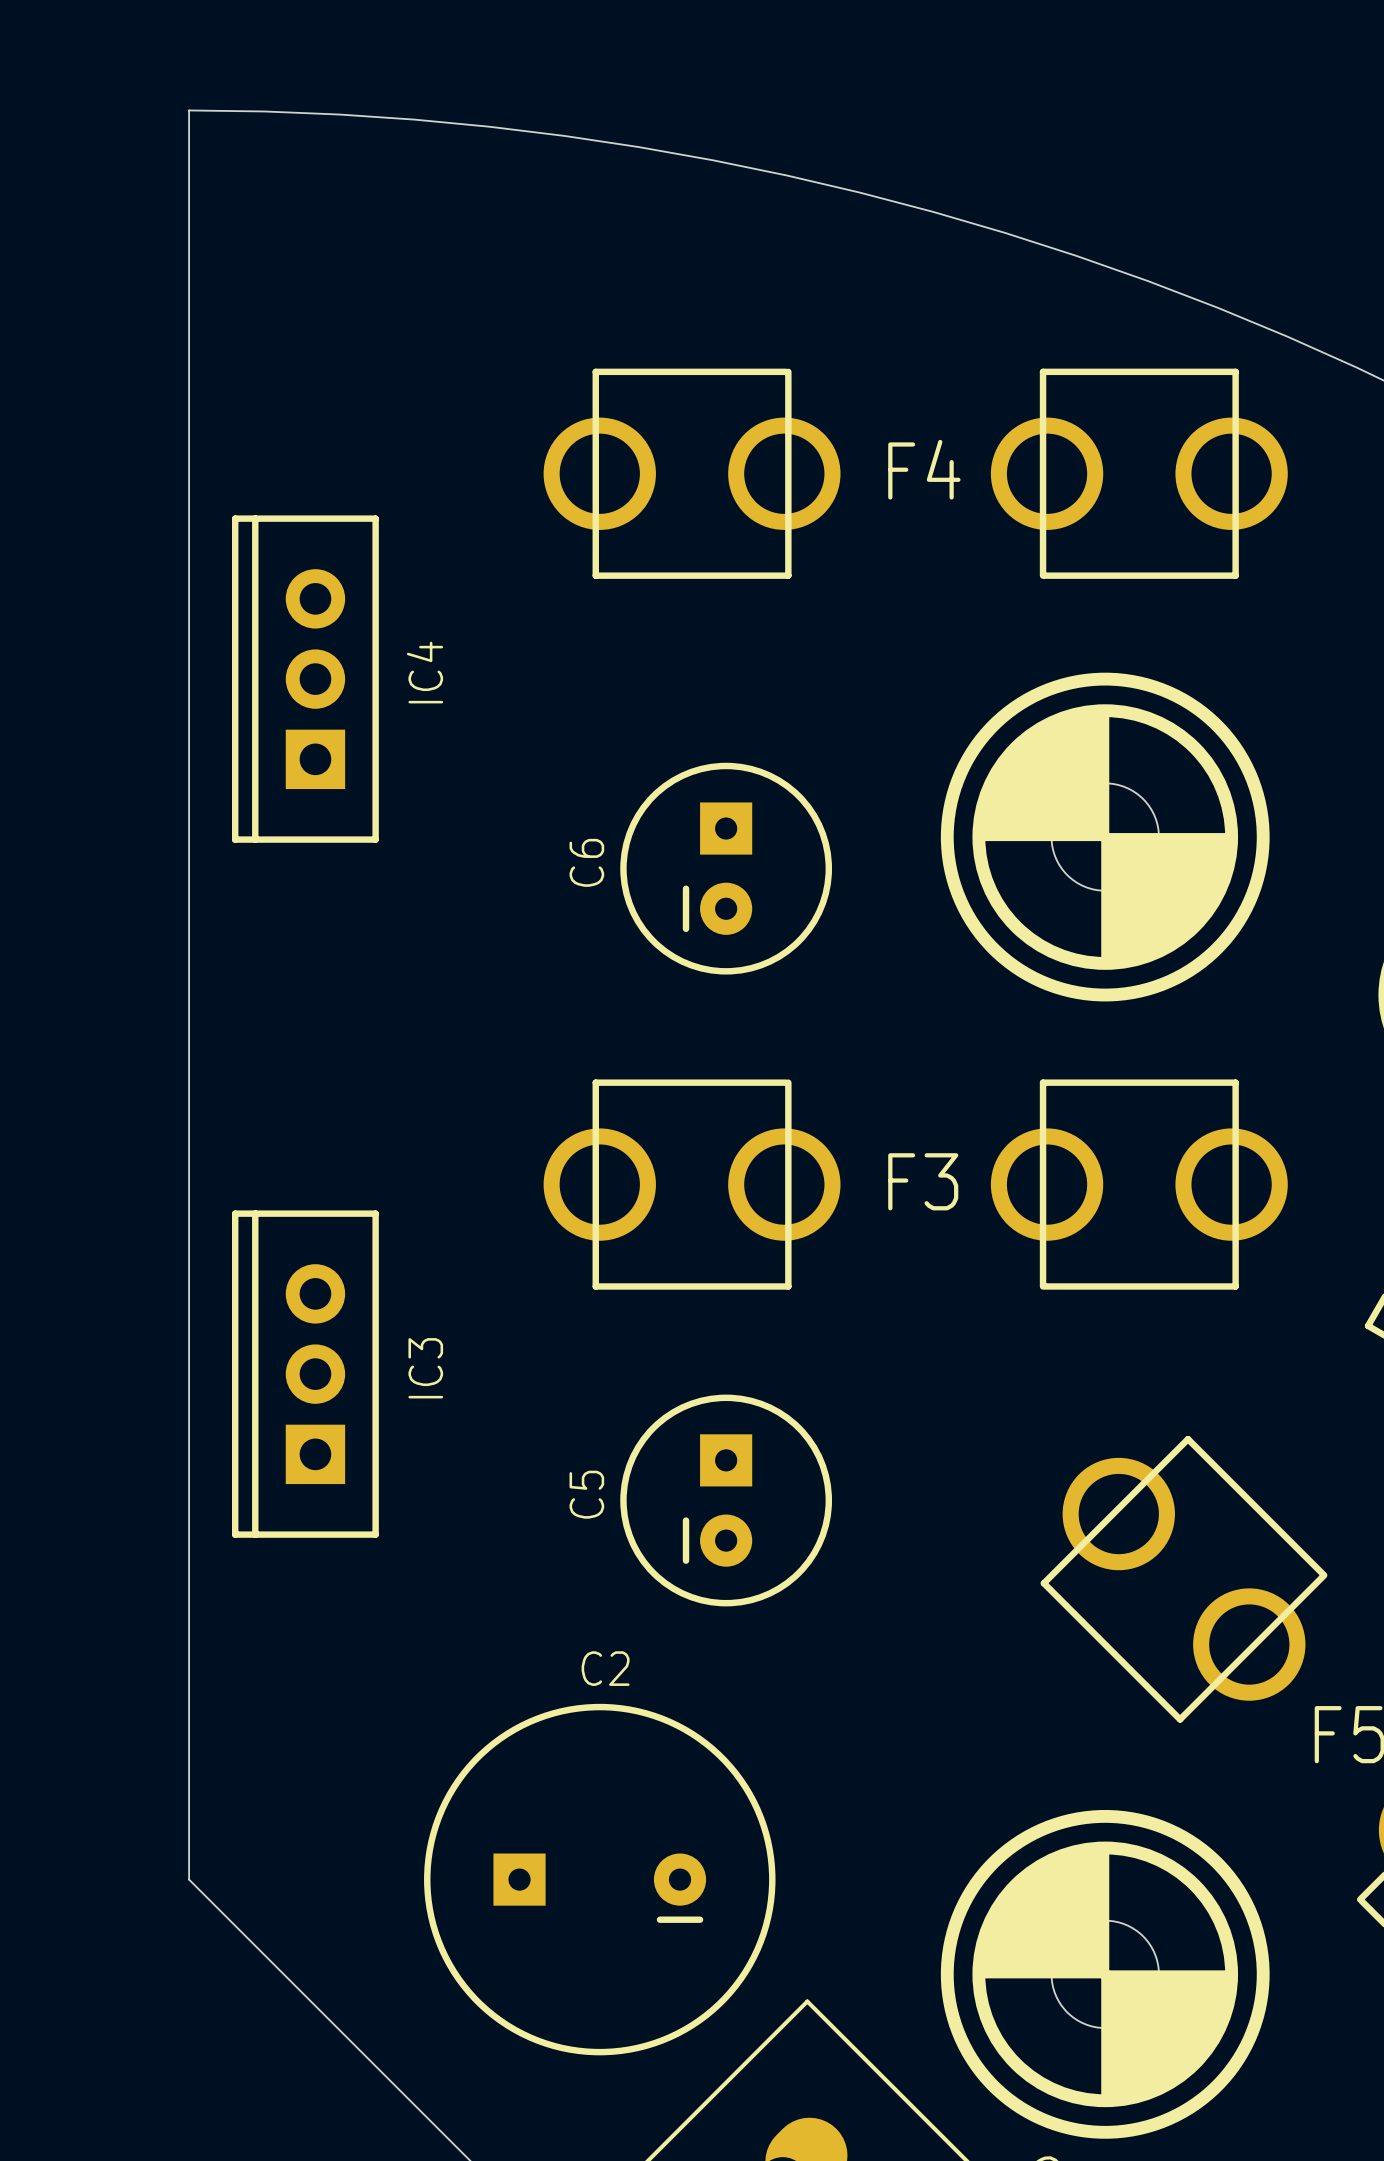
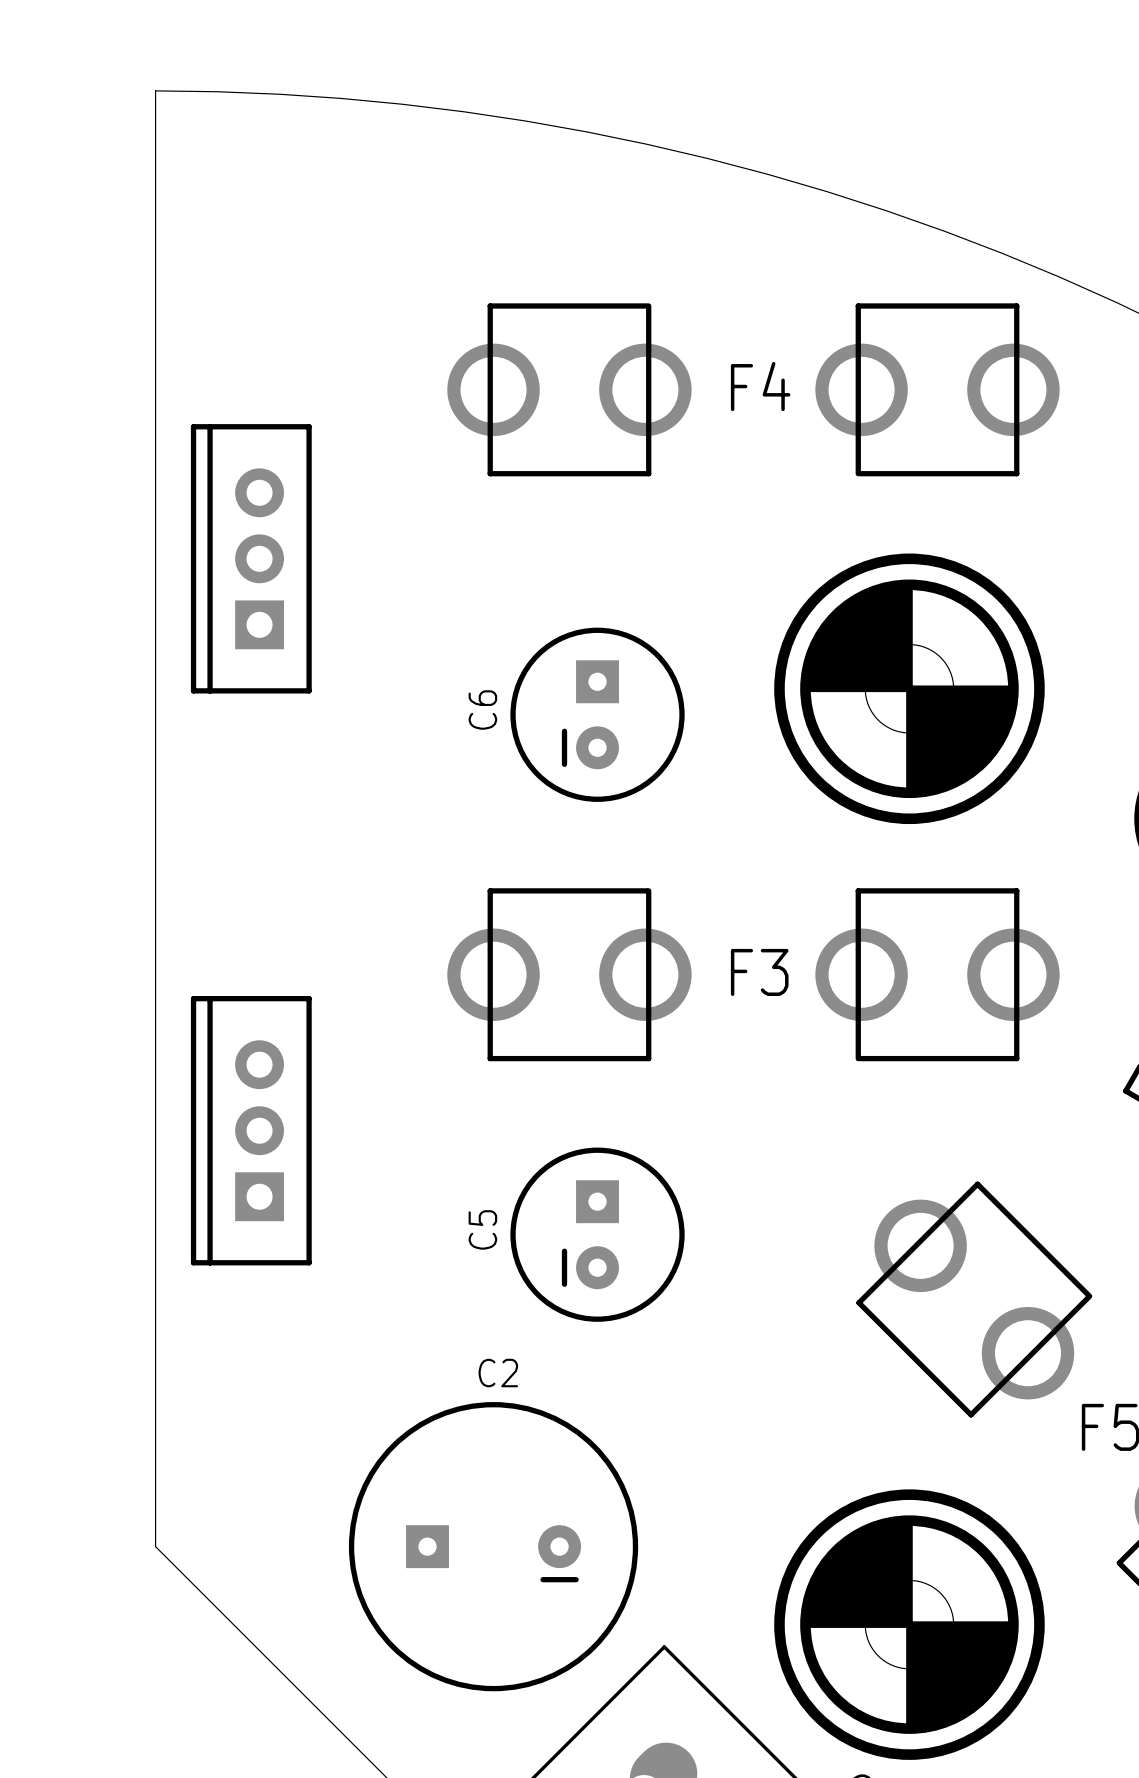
text: IC4 (425, 672) -> none
text: IC3 (425, 1368) -> none

